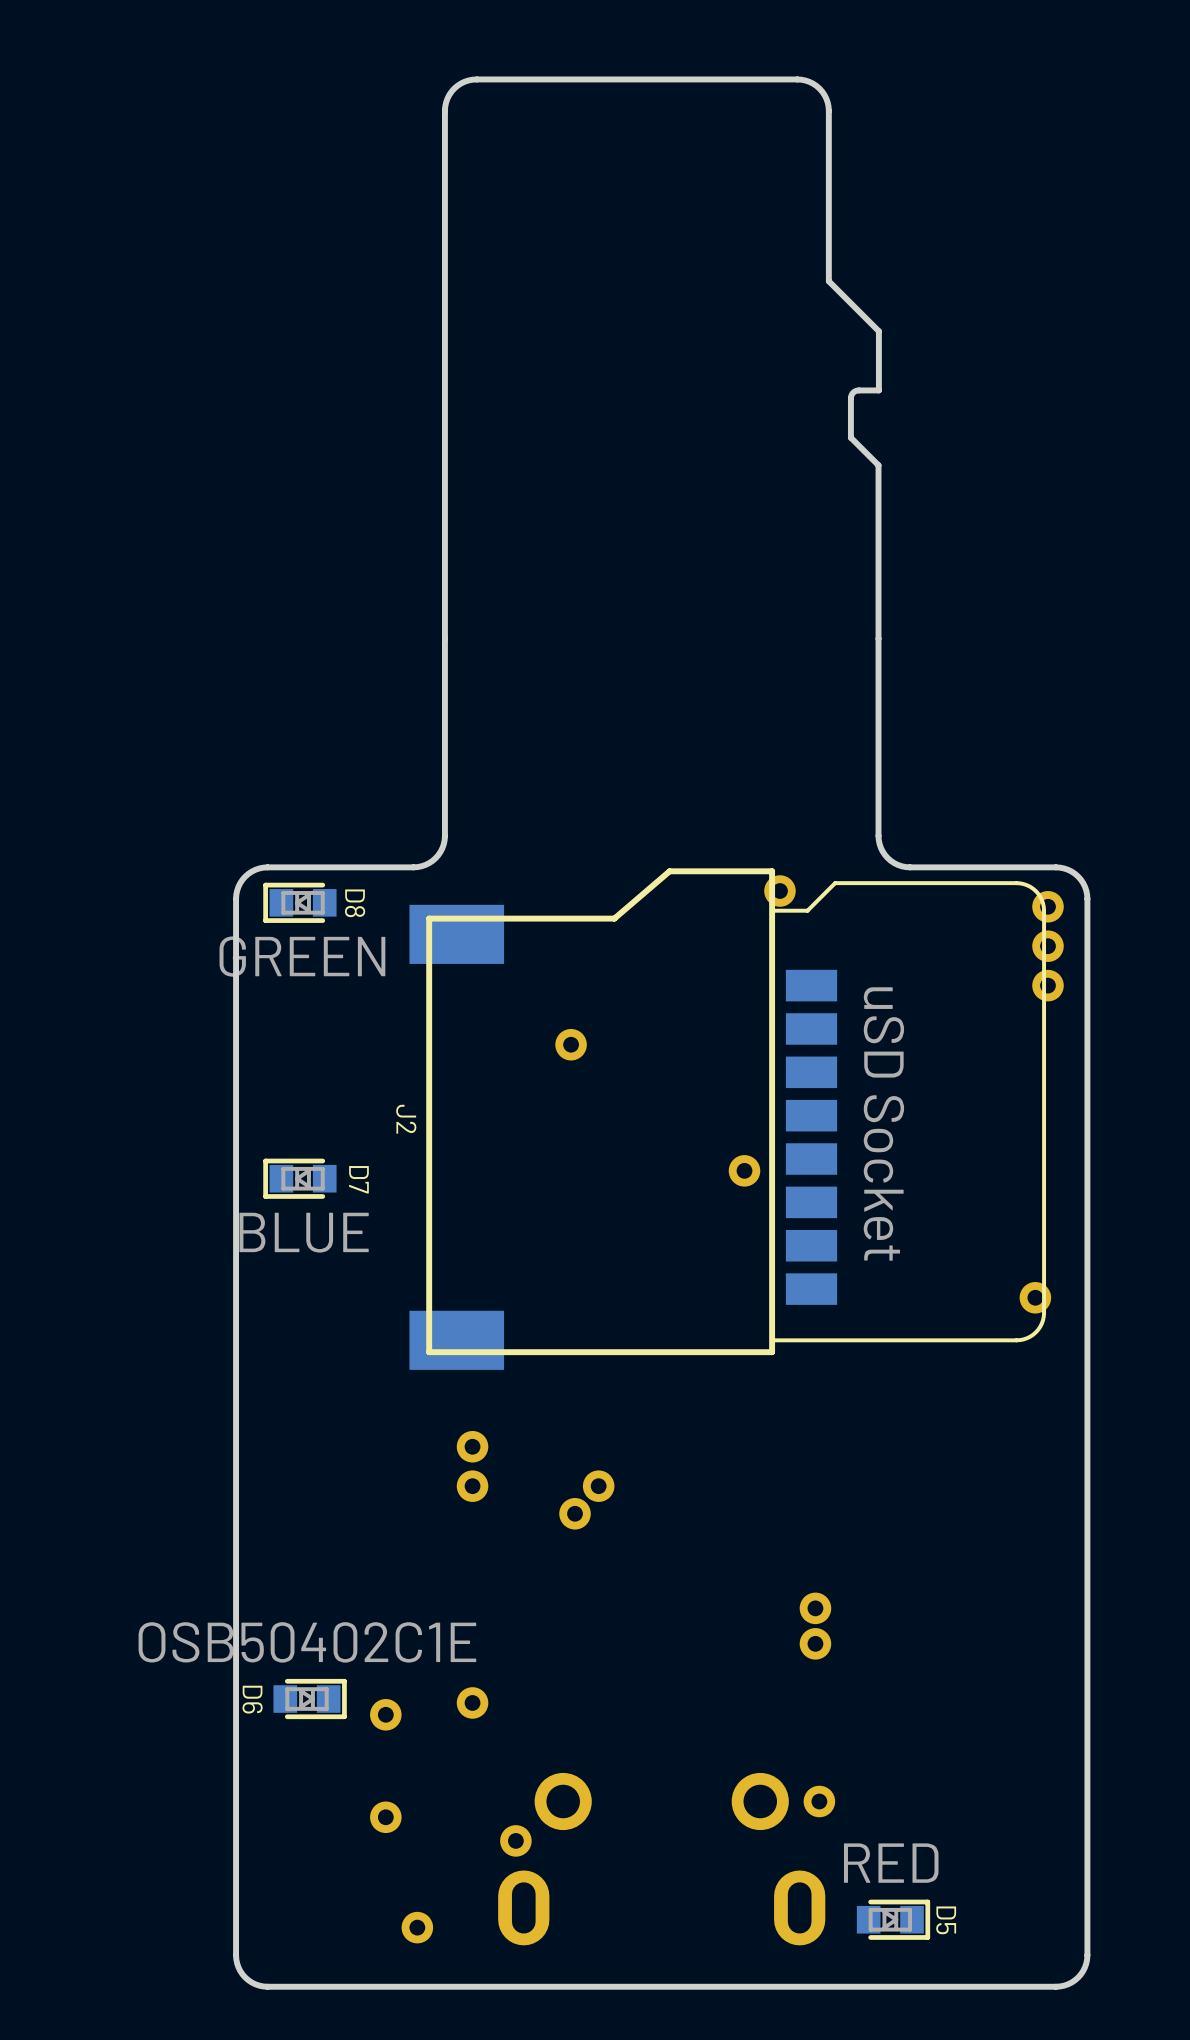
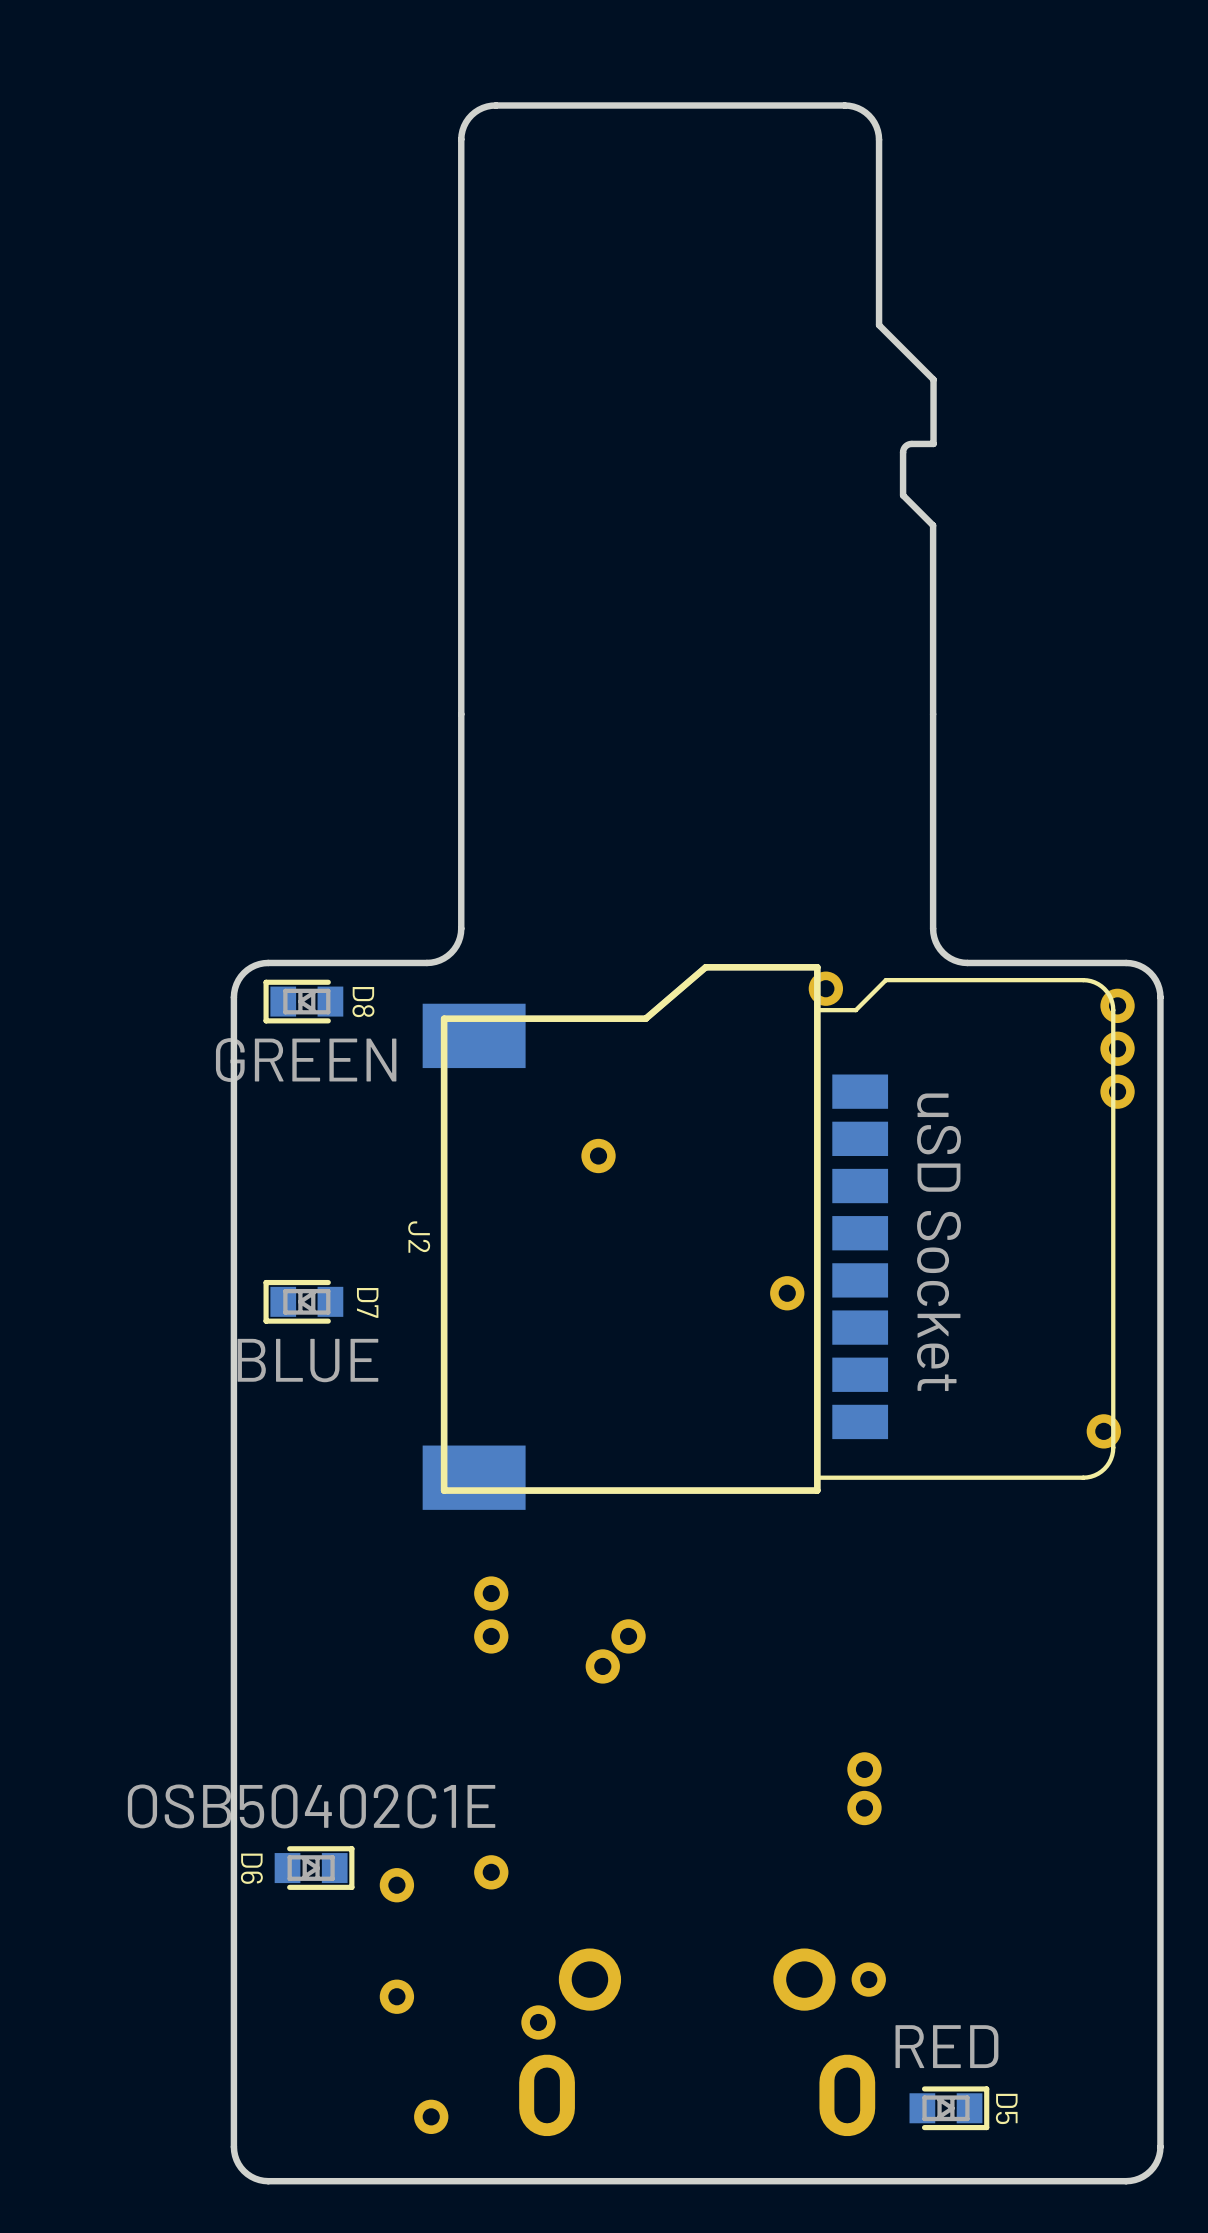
J2 footprint: [409, 868, 1047, 1370] -> [422, 964, 1116, 1510]

